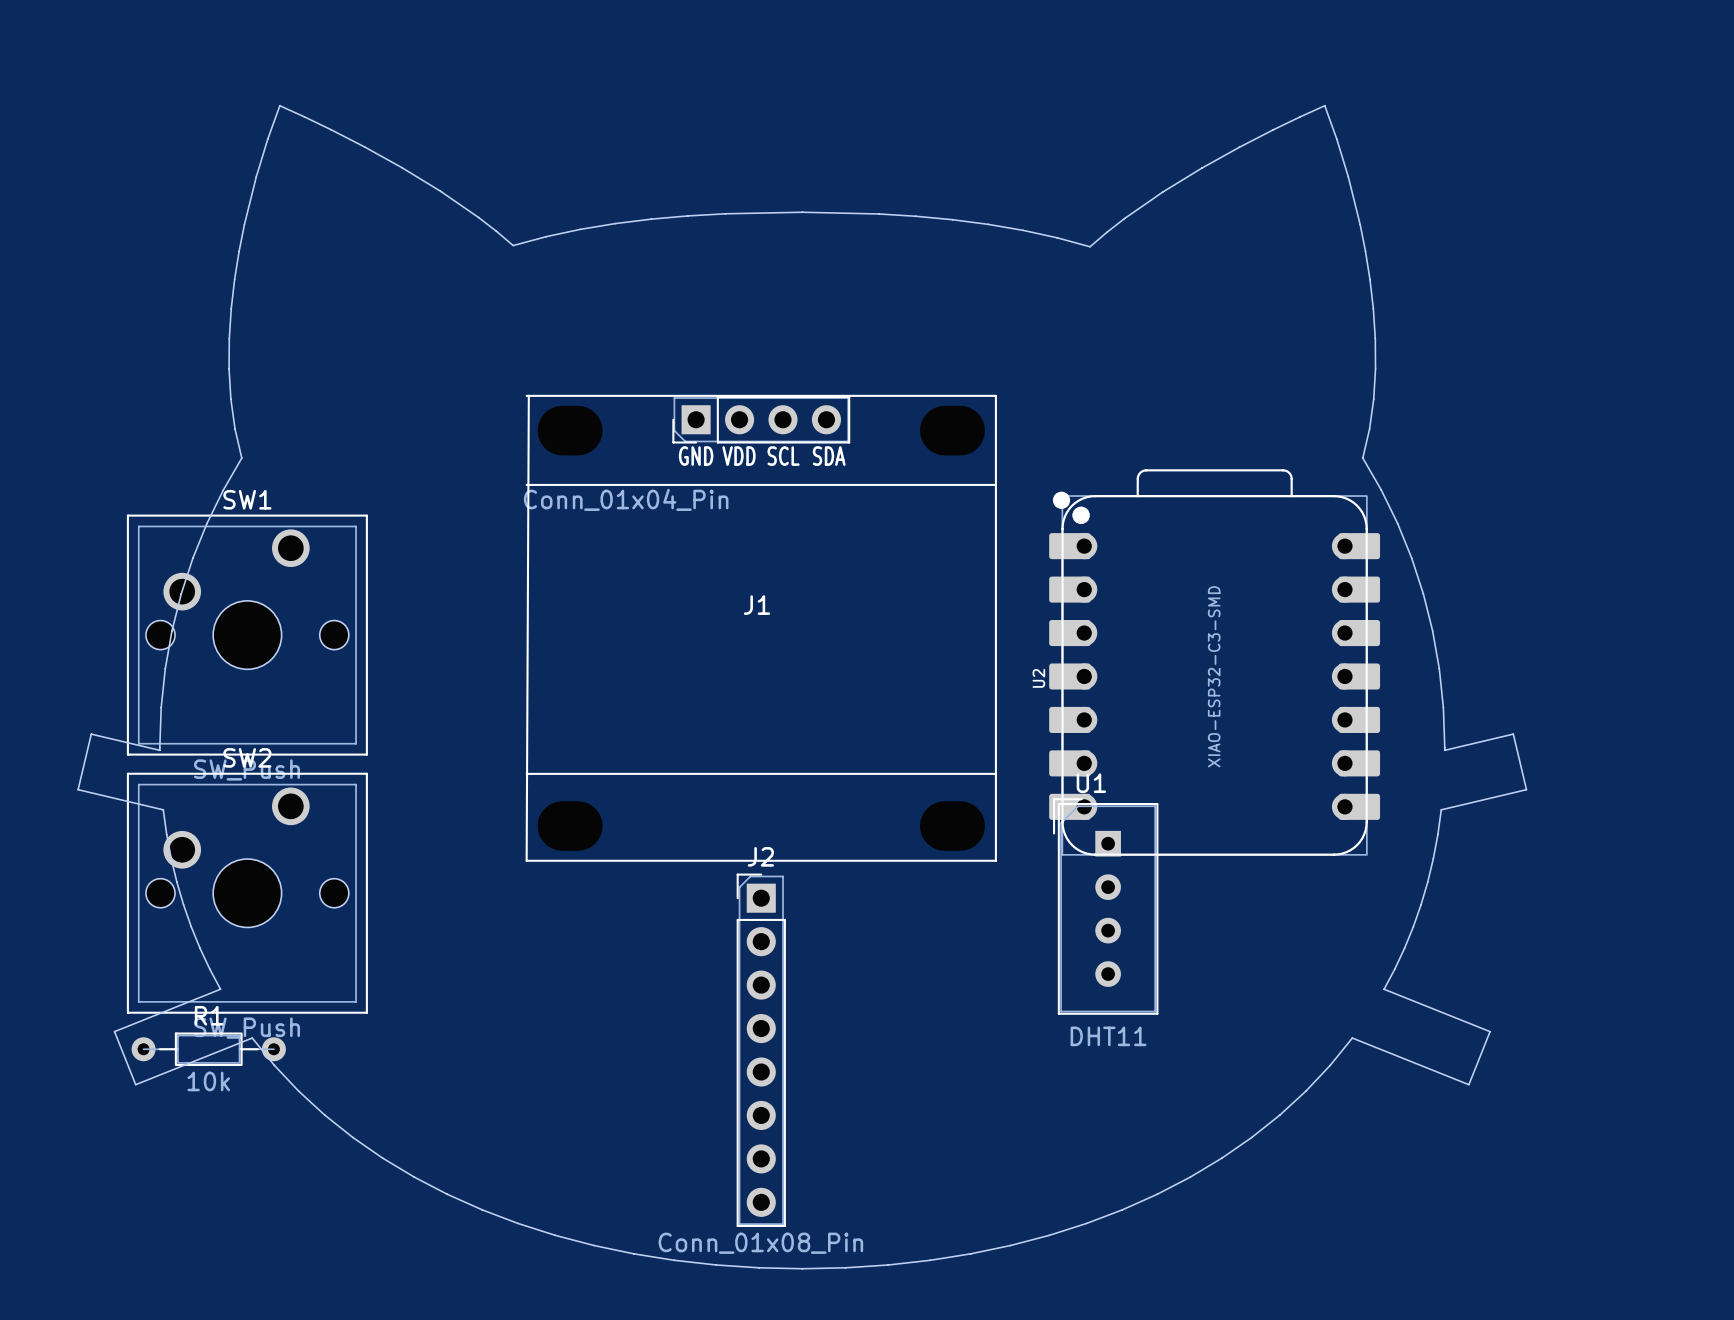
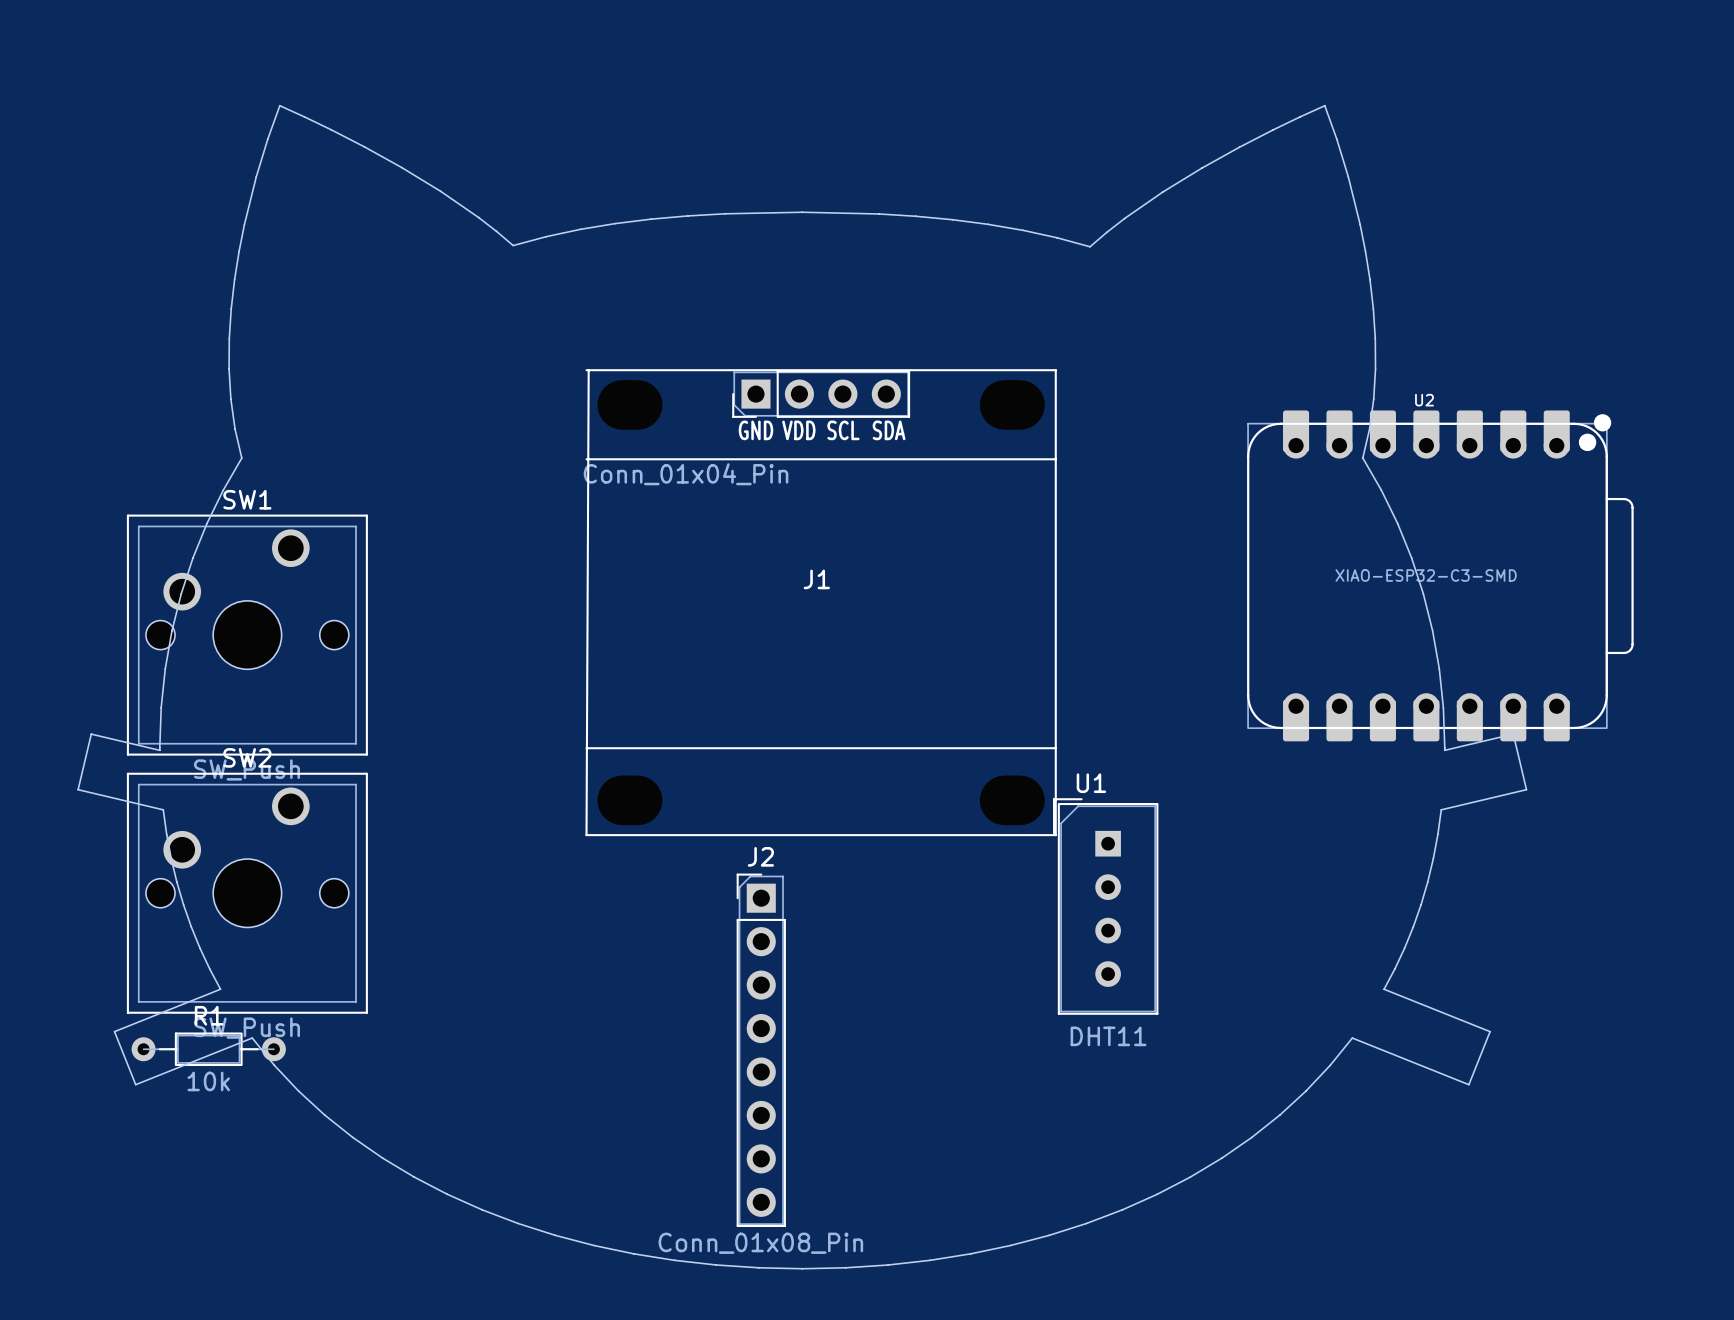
J1 position: (761, 628) -> (821, 602)
U2 rotation: 0° (1214, 662) -> 90° clockwise (1440, 575)
U2 position: (1214, 662) -> (1440, 575)

